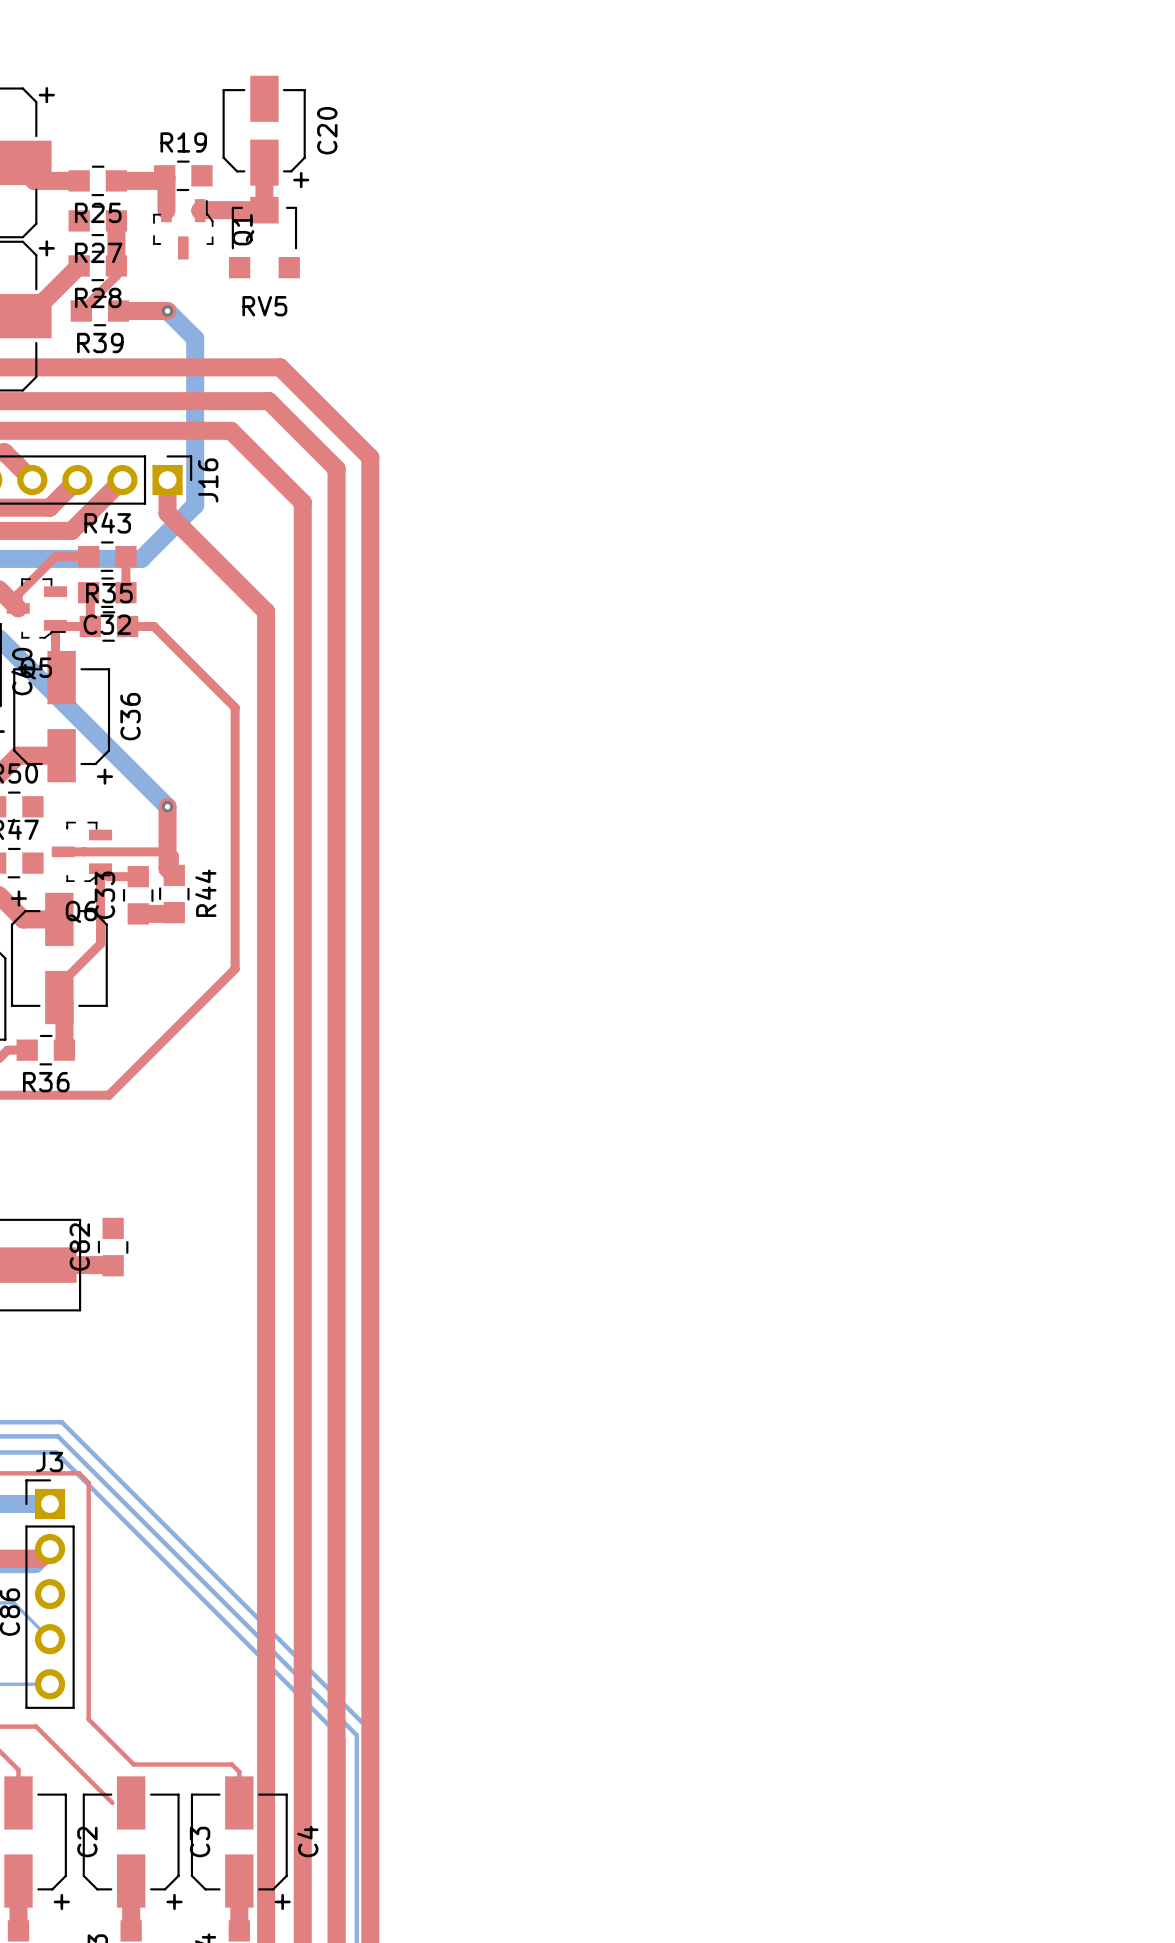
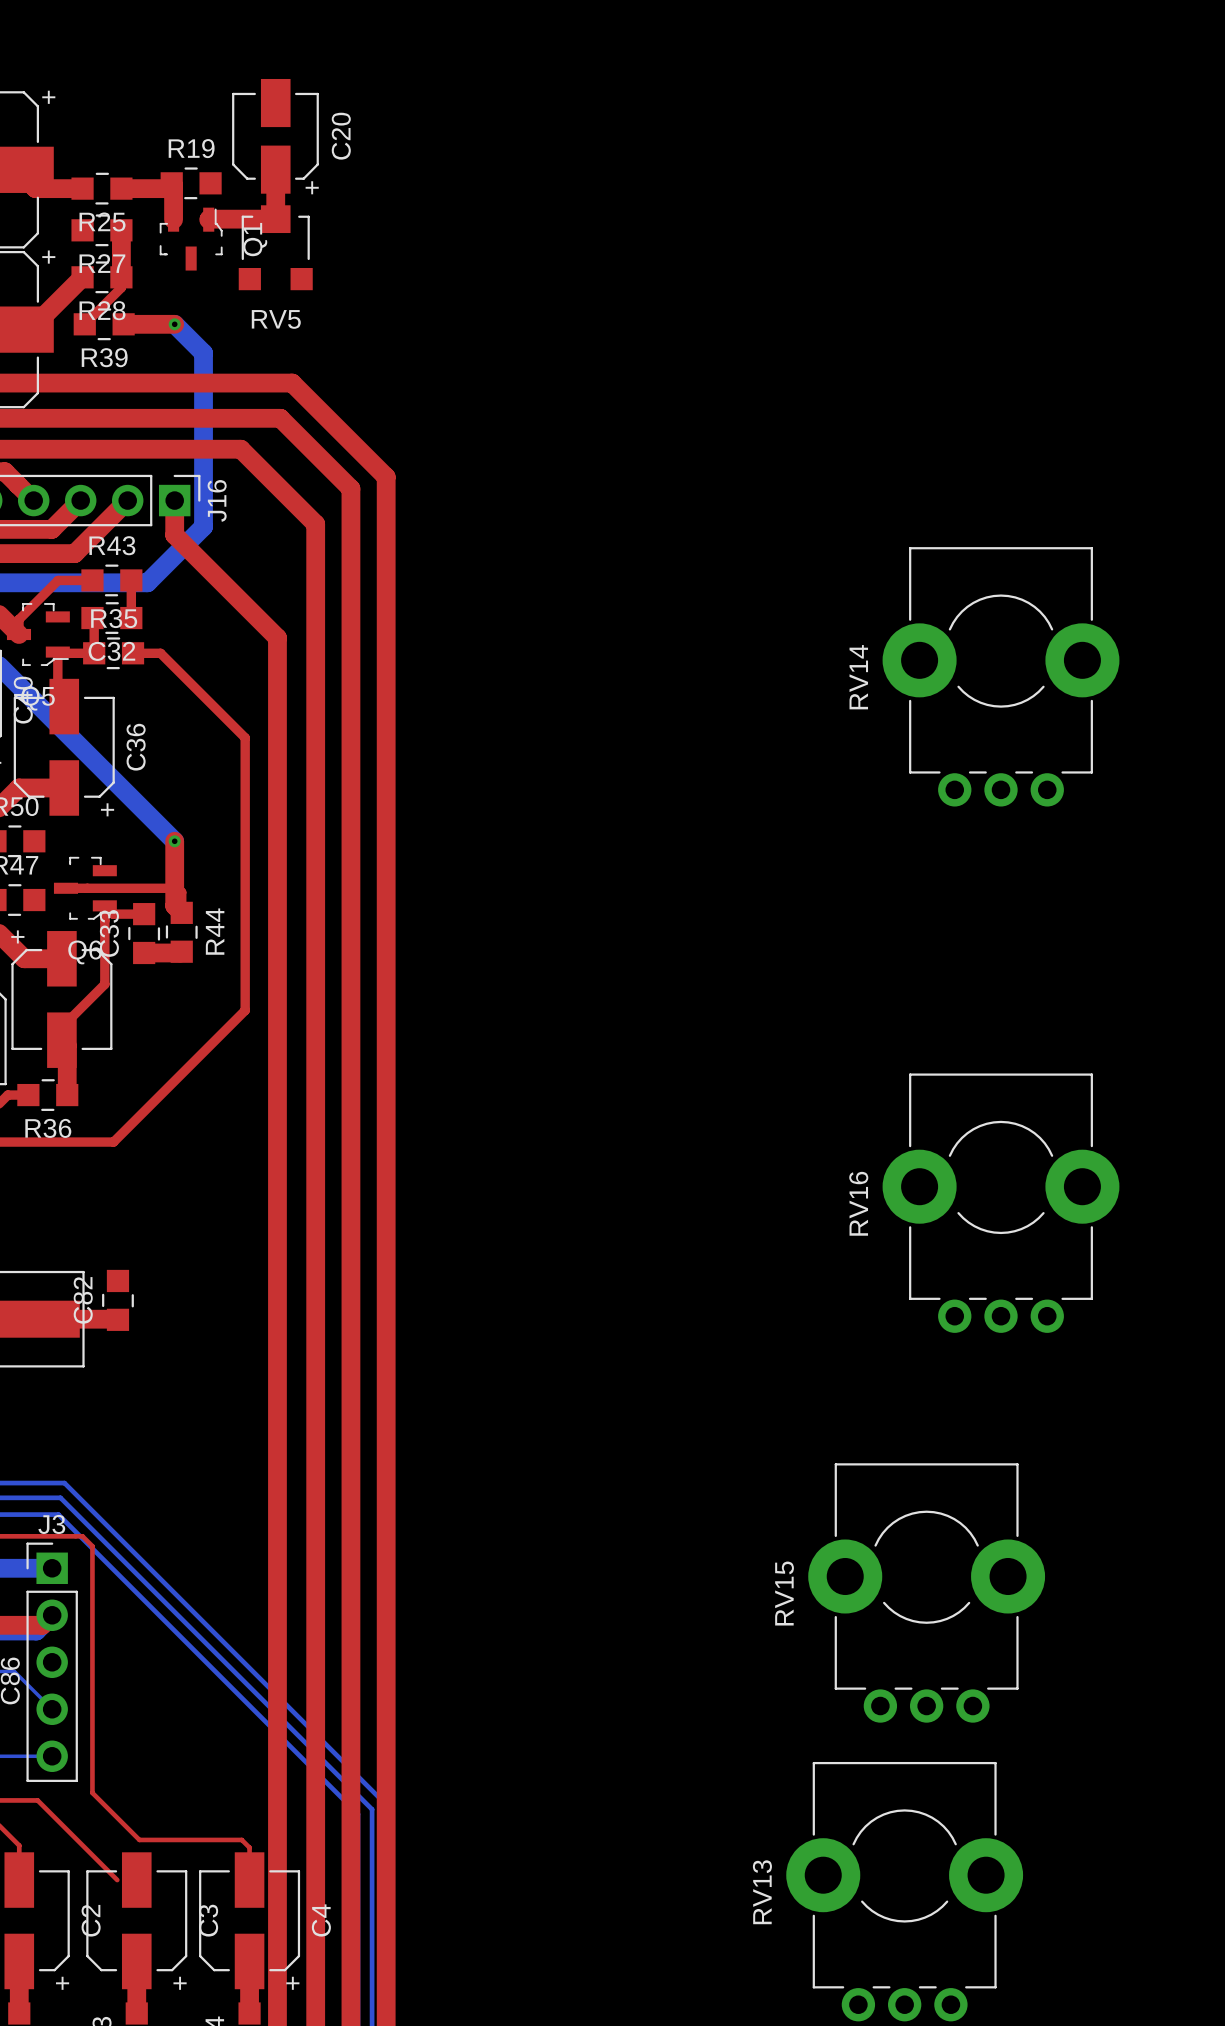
RV14: none -> (1001, 676)
RV16: none -> (1001, 1203)
RV15: none -> (926, 1592)
RV13: none -> (904, 1891)

